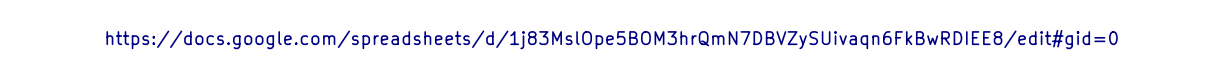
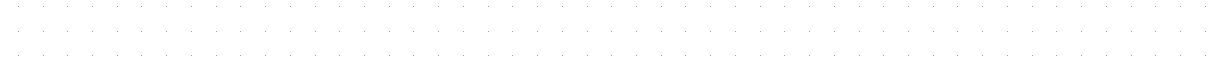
text: https://docs.google.com/spreadsheets/d/1j83MslOpe5BOM3hrQmN7DBVZySUivaqn6FkBwRDIEE8/edit#gid=0 (612, 39) -> none

